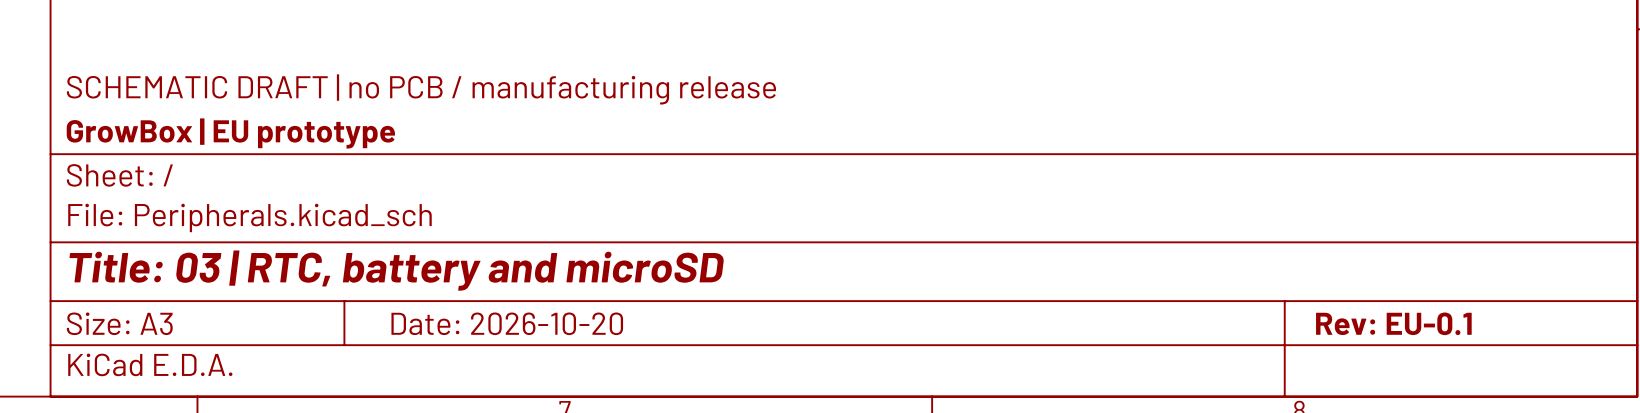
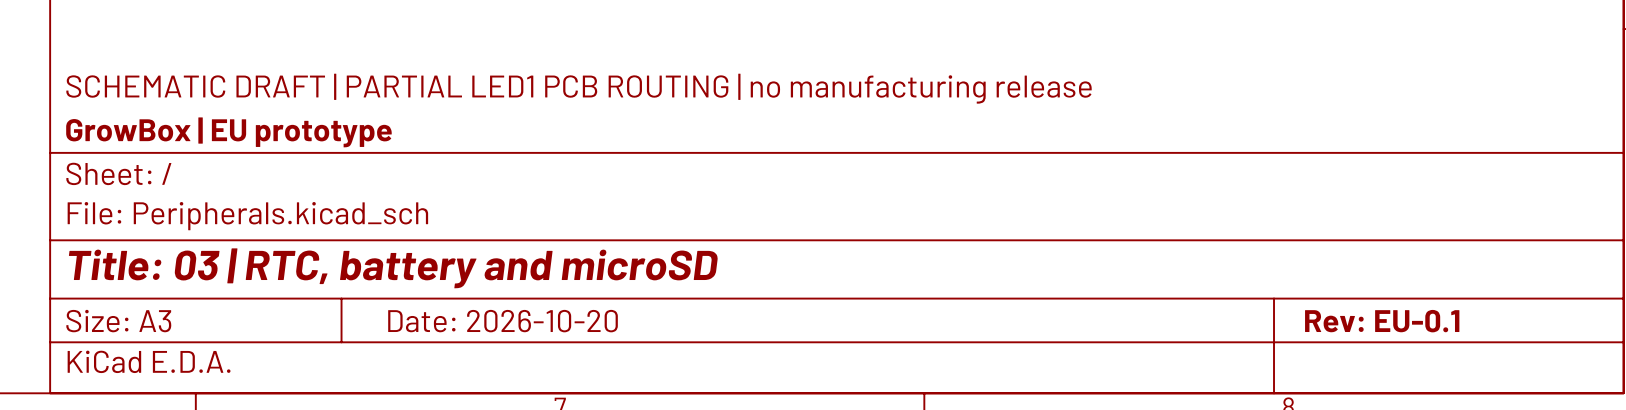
title block: SCHEMATIC DRAFT | no PCB / manufacturing release (421, 89) -> SCHEMATIC DRAFT | PARTIAL LED1 PCB ROUTING | no manufacturing release (579, 88)

